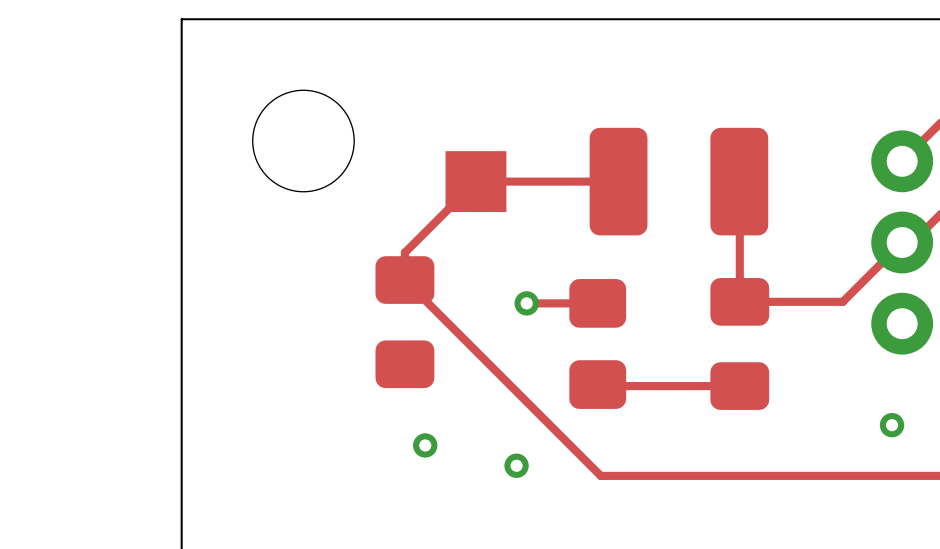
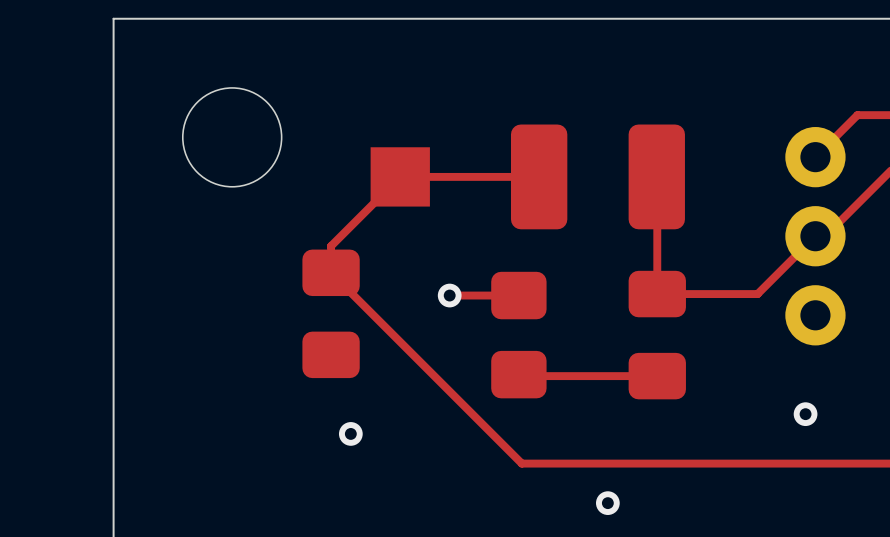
via position: (516, 465) -> (607, 503)

